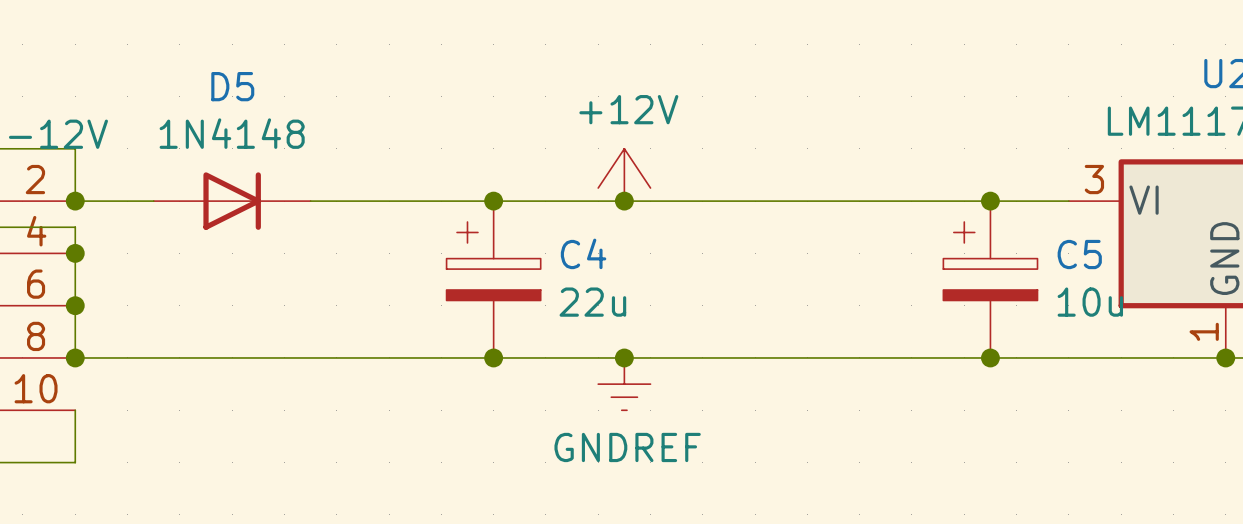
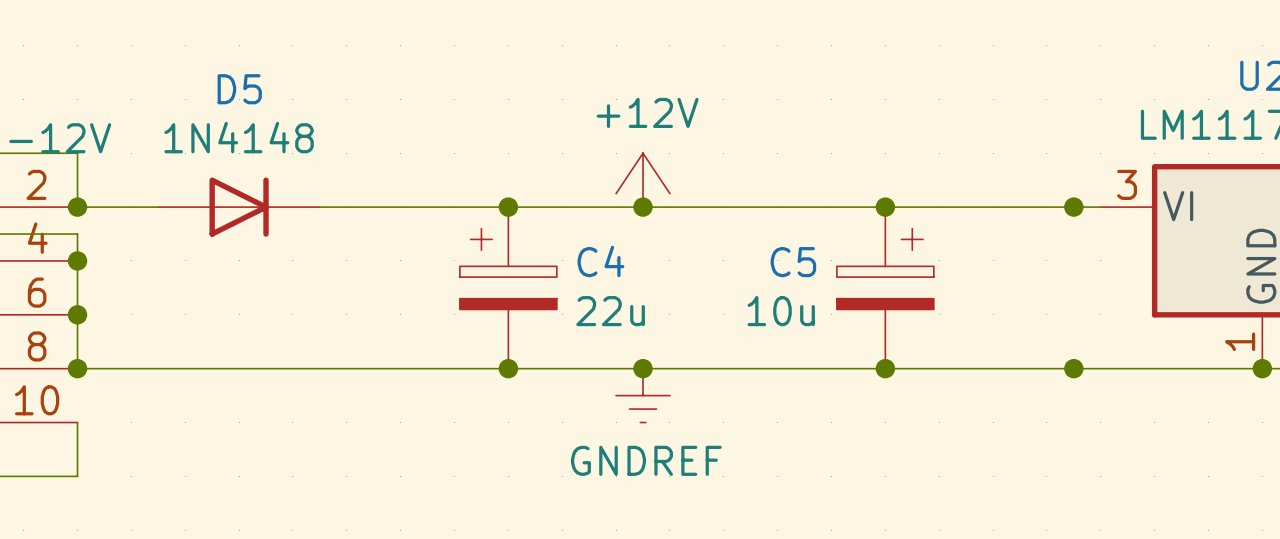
junction: none -> (885, 207)
junction position: (990, 201) -> (1073, 207)
C5 flip: as is (990, 261) -> left-right (885, 269)
C5 position: (990, 279) -> (885, 287)
junction: none -> (885, 368)
junction position: (990, 357) -> (1073, 368)

